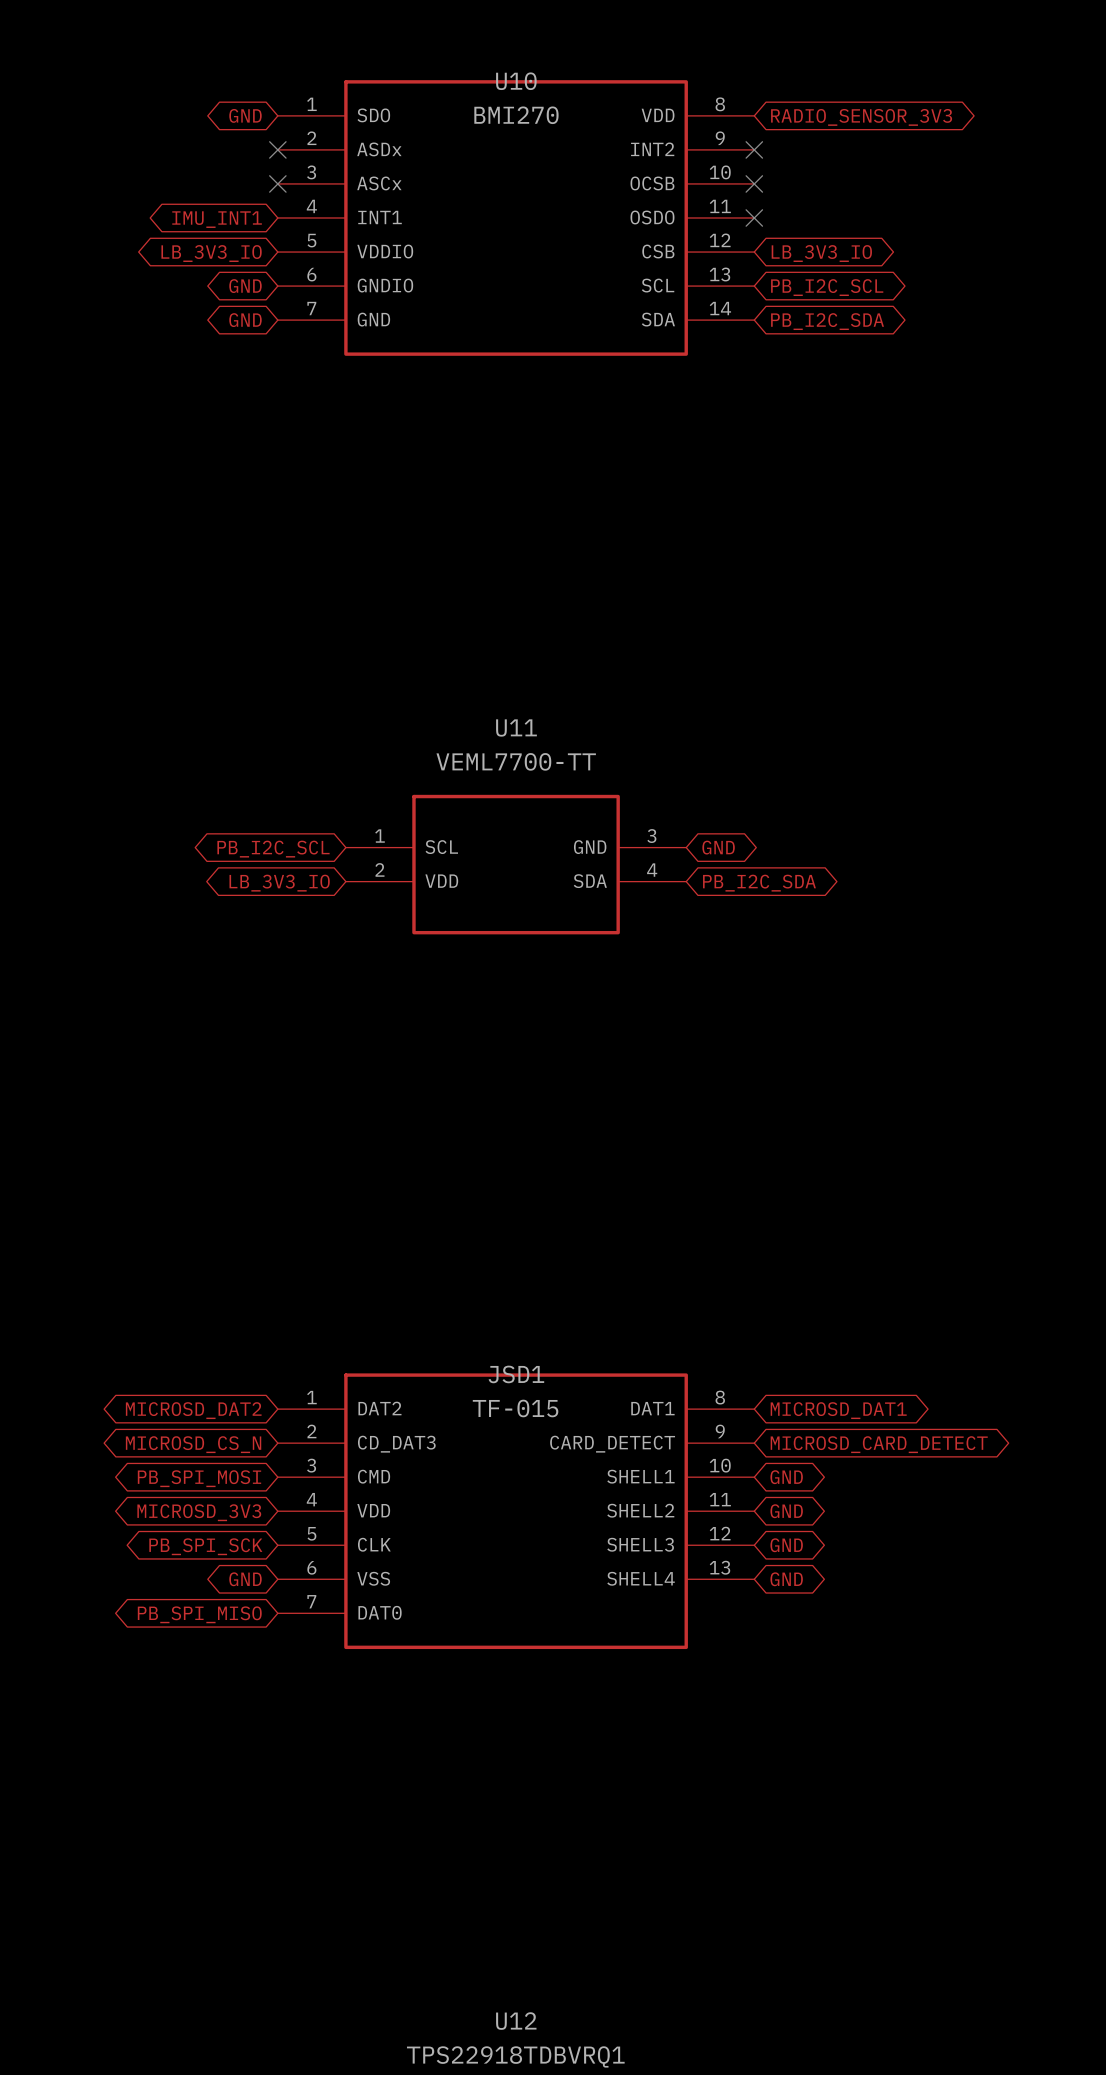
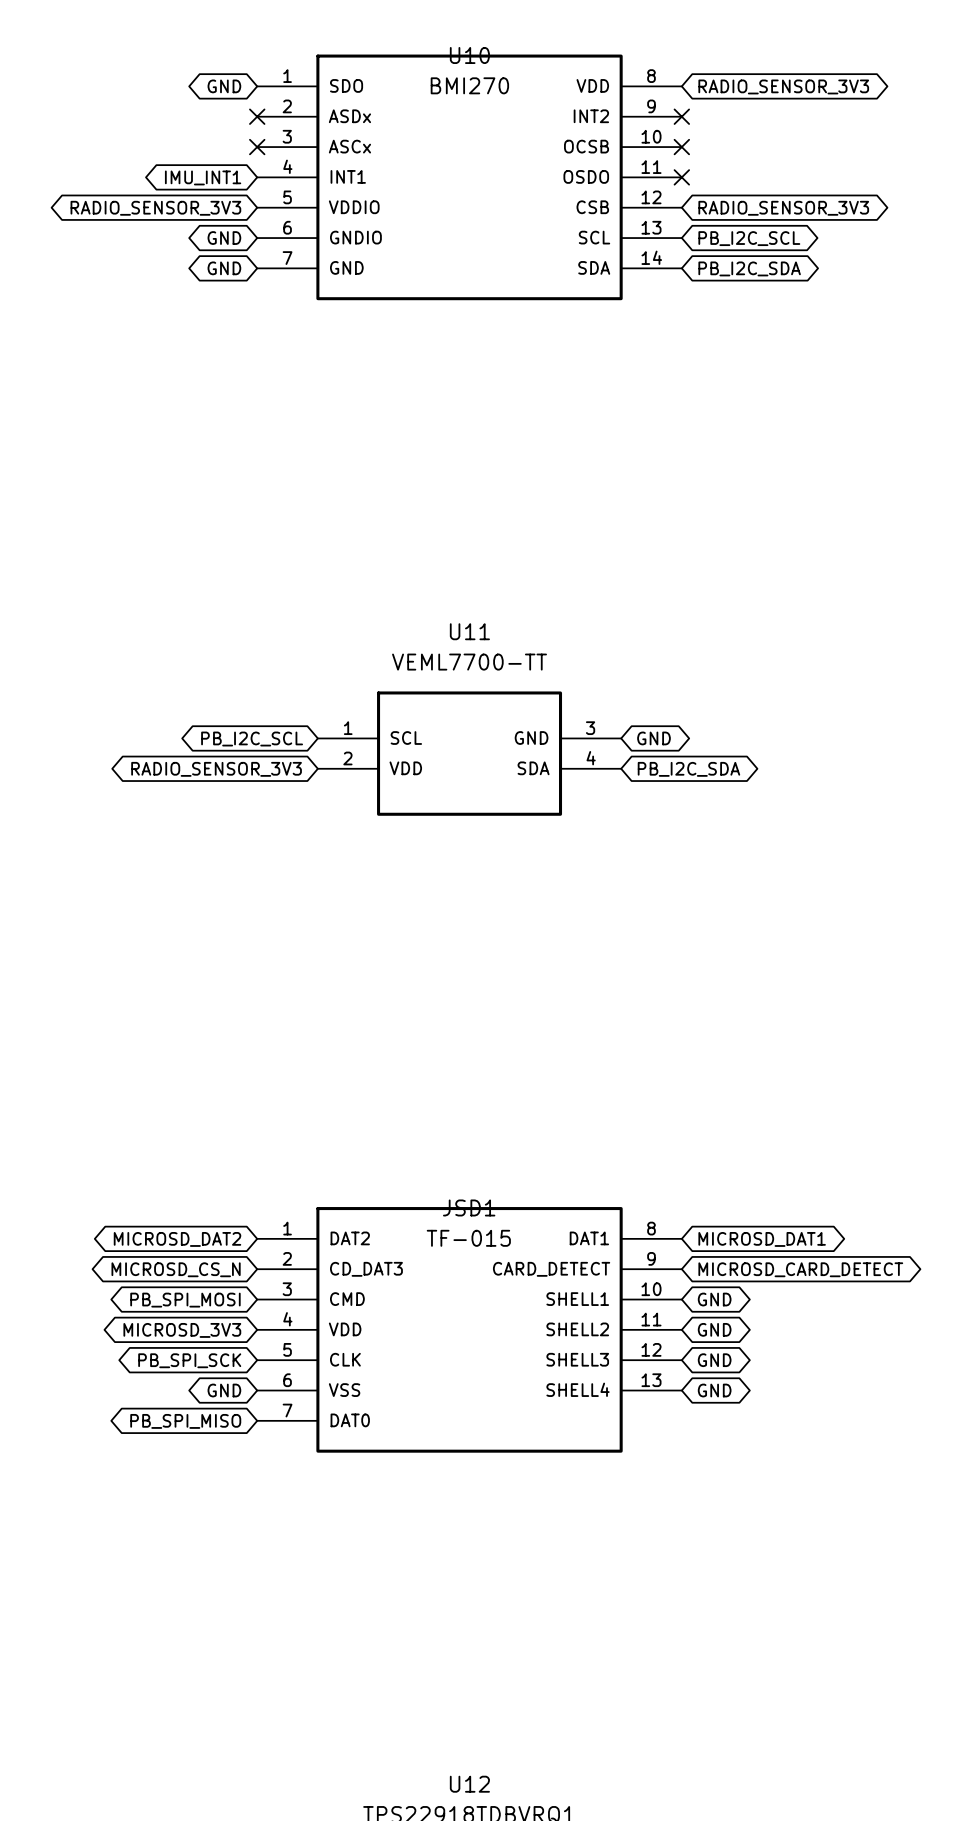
global label: LB_3V3_IO (211, 253) -> RADIO_SENSOR_3V3 (155, 208)
global label: LB_3V3_IO (821, 253) -> RADIO_SENSOR_3V3 (783, 208)
global label: LB_3V3_IO (279, 883) -> RADIO_SENSOR_3V3 (216, 769)

